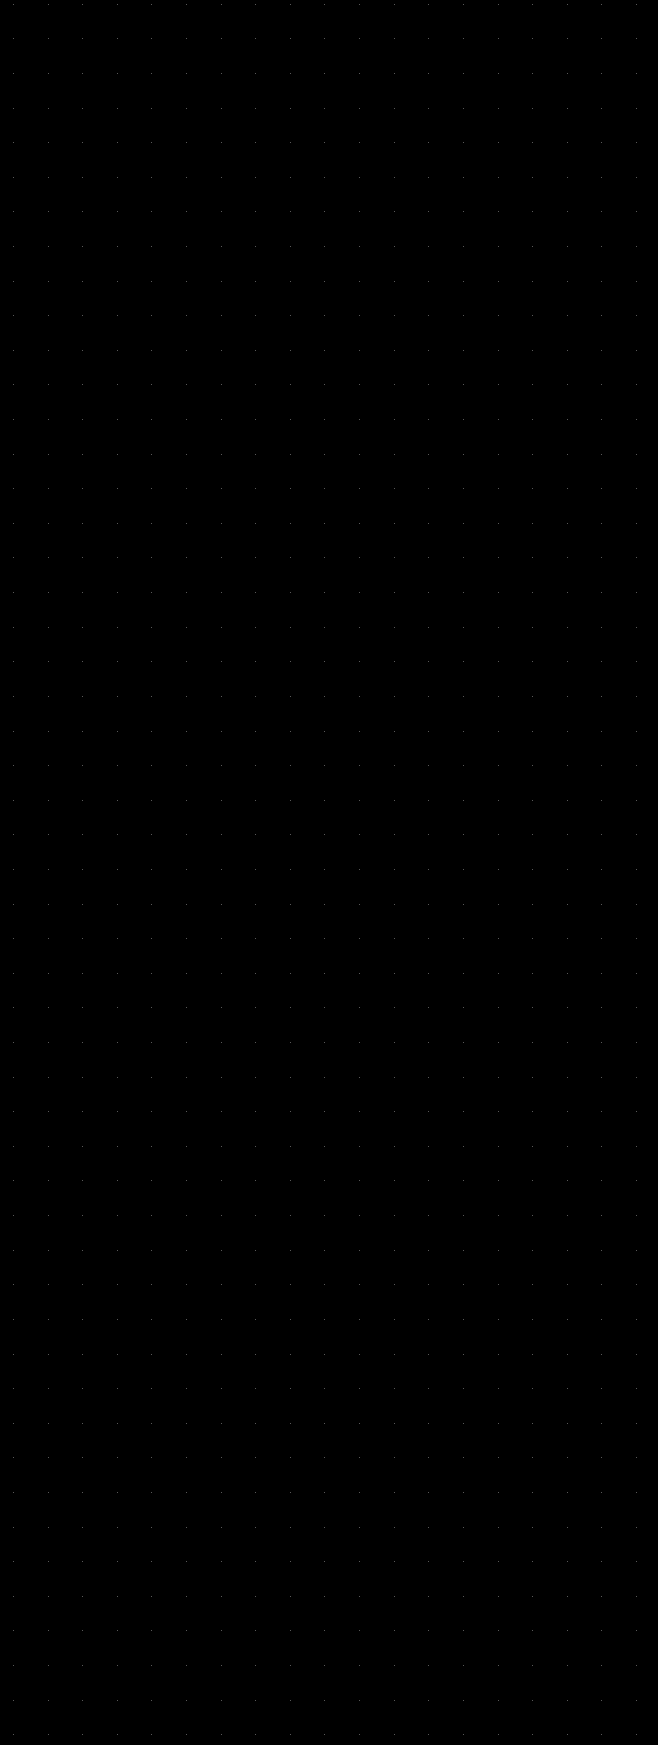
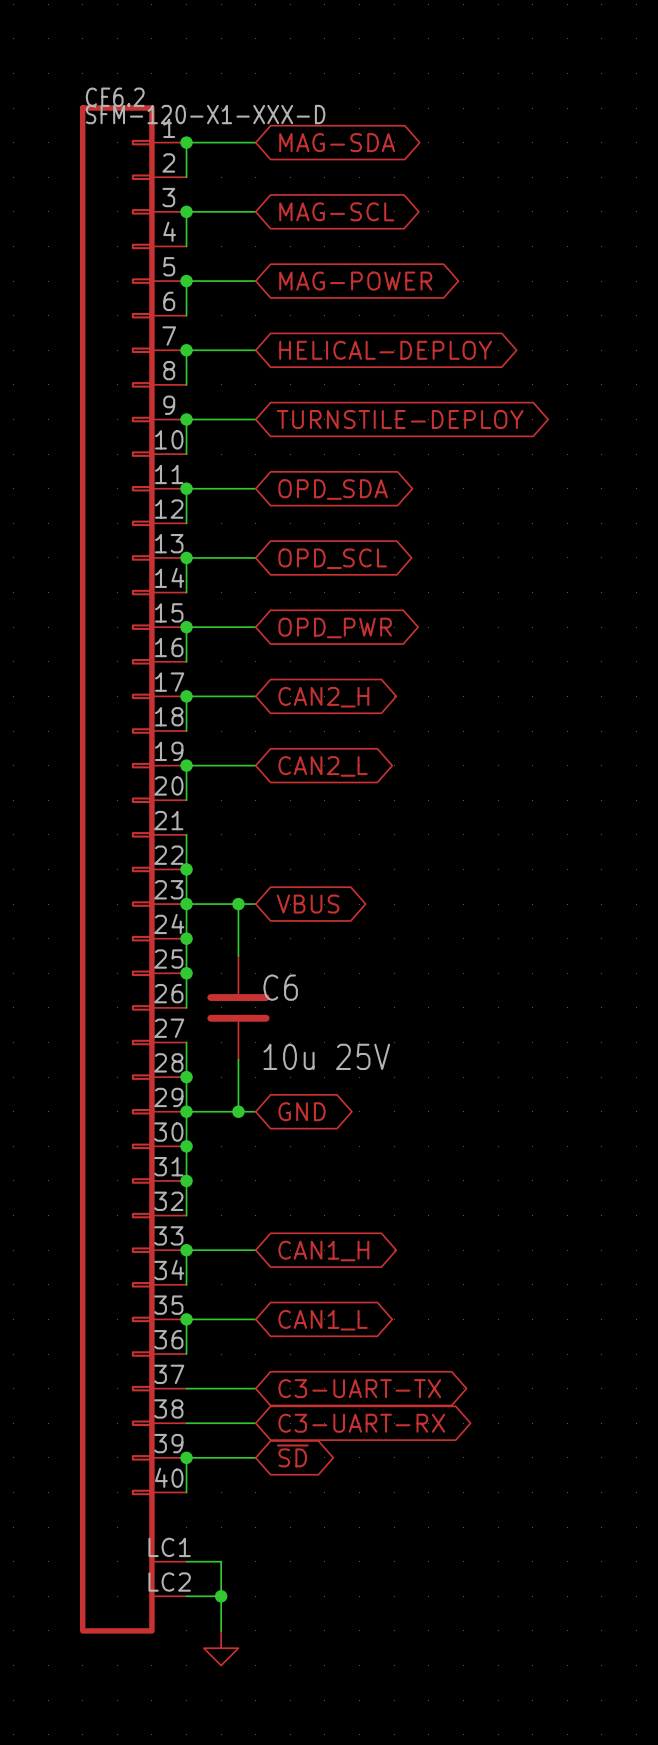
junction: none -> (186, 142)
wire: none -> (255, 142) (186, 142) (186, 177)
global label: none -> MAG-SDA (337, 142)
junction: none -> (186, 211)
wire: none -> (255, 211) (186, 211) (186, 246)
global label: none -> MAG-SCL (336, 211)
junction: none -> (186, 281)
wire: none -> (255, 281) (186, 281) (186, 315)
global label: none -> MAG-POWER (355, 281)
junction: none -> (186, 350)
wire: none -> (255, 350) (186, 350) (186, 384)
global label: none -> HELICAL-DEPLOY (385, 350)
junction: none -> (186, 419)
wire: none -> (255, 419) (186, 419) (186, 454)
global label: none -> TURNSTILE-DEPLOY (400, 419)
junction: none -> (186, 488)
wire: none -> (255, 488) (186, 488) (186, 523)
global label: none -> OPD_SDA (333, 489)
junction: none -> (186, 557)
wire: none -> (255, 557) (186, 557) (186, 592)
global label: none -> OPD_SCL (332, 558)
junction: none -> (186, 627)
wire: none -> (255, 627) (186, 627) (186, 661)
global label: none -> OPD_PWR (335, 627)
junction: none -> (186, 696)
wire: none -> (255, 696) (186, 696) (186, 731)
global label: none -> CAN2_H (323, 697)
junction: none -> (186, 765)
wire: none -> (255, 765) (186, 765) (186, 800)
global label: none -> CAN2_L (323, 766)
wire: none -> (186, 834) (186, 1007)
CF6.2: none -> SFM-120-X1-XXX-D (133, 869)
junction: none -> (186, 869)
wire: none -> (186, 904) (255, 904)
junction: none -> (186, 904)
wire: none -> (238, 904) (238, 955)
junction: none -> (238, 904)
global label: none -> VBUS (308, 904)
junction: none -> (186, 938)
junction: none -> (186, 973)
C6: none -> 10u 25V (238, 1007)
wire: none -> (186, 1042) (186, 1215)
wire: none -> (238, 1059) (238, 1111)
junction: none -> (186, 1077)
wire: none -> (186, 1111) (255, 1111)
junction: none -> (186, 1111)
junction: none -> (238, 1111)
global label: none -> GND (302, 1111)
junction: none -> (186, 1146)
junction: none -> (186, 1180)
junction: none -> (186, 1250)
wire: none -> (255, 1250) (186, 1250) (186, 1284)
global label: none -> CAN1_H (323, 1250)
junction: none -> (186, 1319)
wire: none -> (255, 1319) (186, 1319) (186, 1354)
global label: none -> CAN1_L (323, 1320)
wire: none -> (186, 1388) (255, 1388)
global label: none -> C3-UART-TX (359, 1388)
wire: none -> (186, 1423) (255, 1423)
global label: none -> C3-UART-RX (361, 1423)
global label: none -> ~{SD} (292, 1455)
junction: none -> (186, 1457)
wire: none -> (255, 1457) (186, 1457) (186, 1492)
wire: none -> (186, 1561) (221, 1561) (221, 1630)
wire: none -> (186, 1596) (221, 1596)
junction: none -> (221, 1596)
power symbol: none -> (221, 1648)

